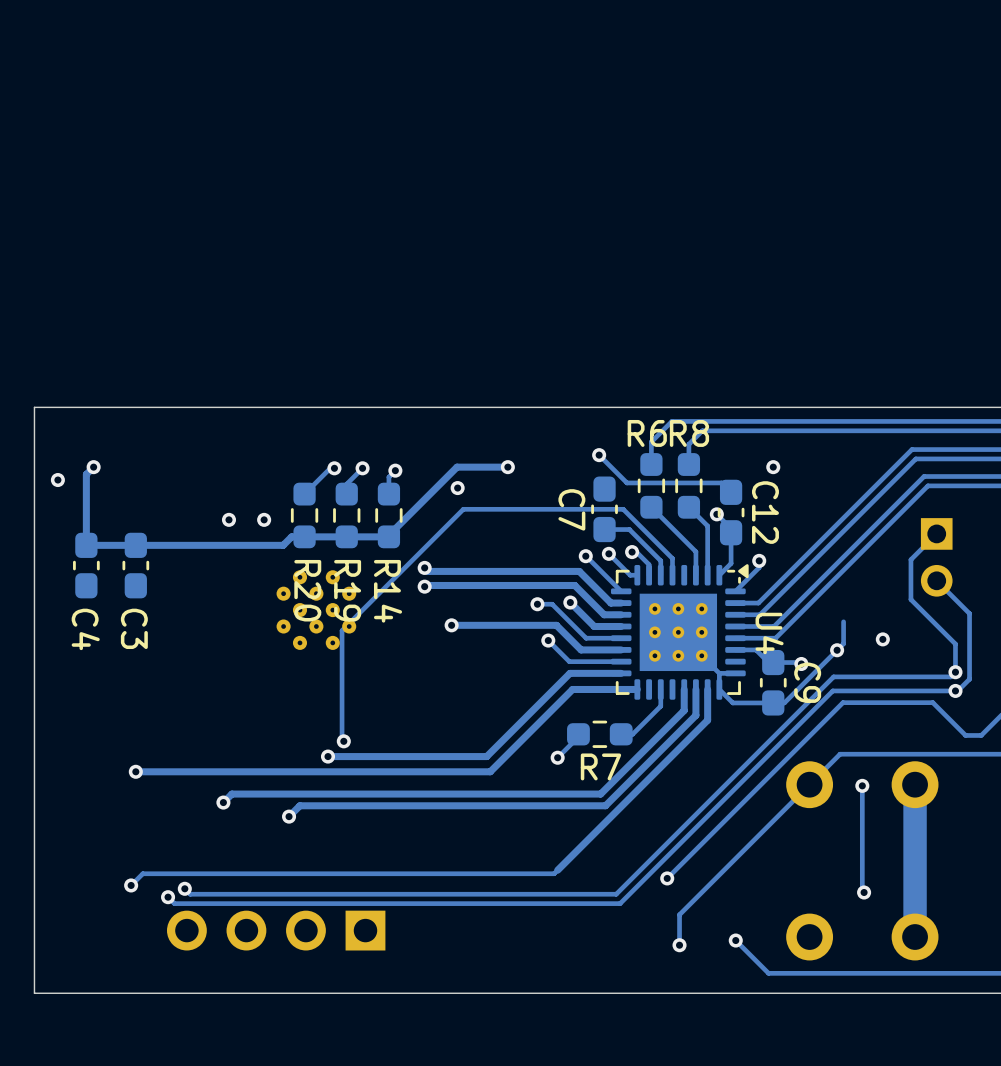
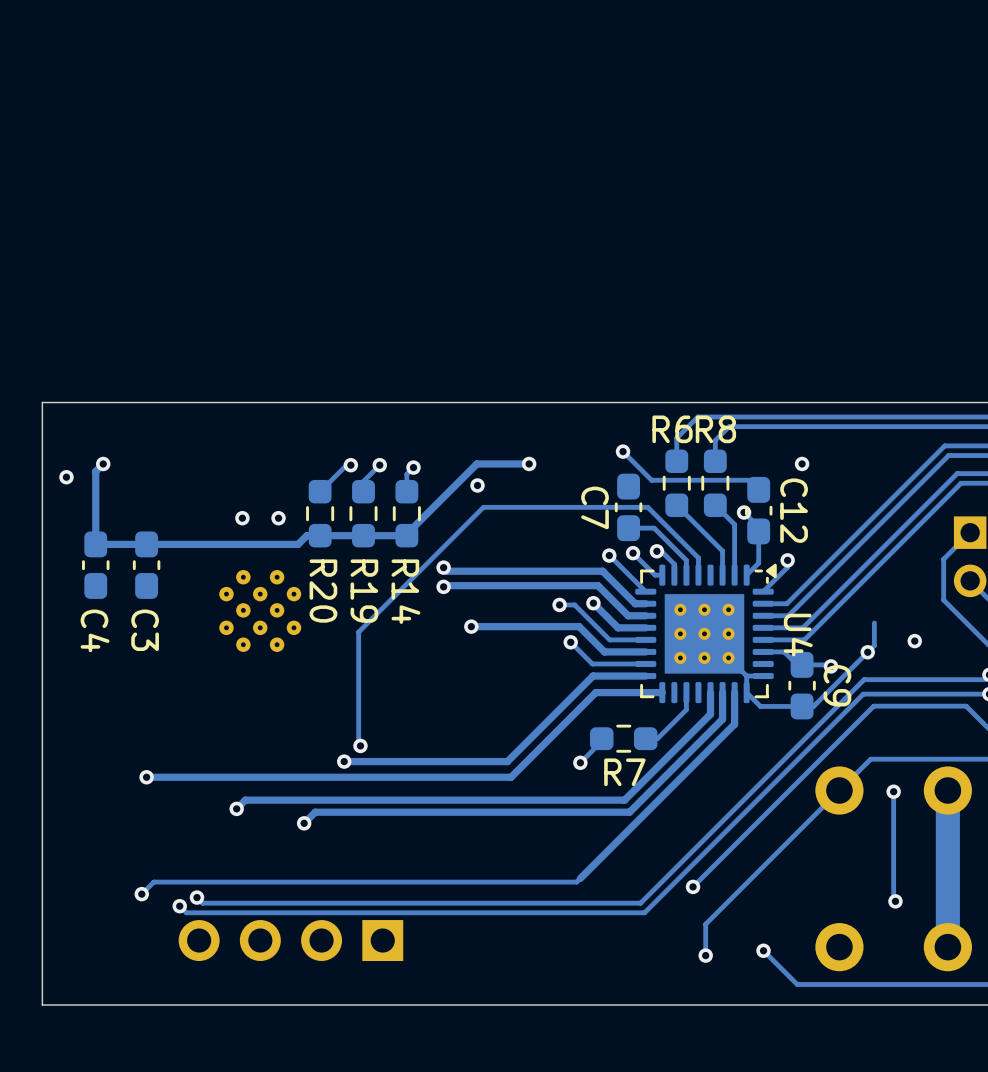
part: none -> (260, 610)
part: (316, 610) -> none

